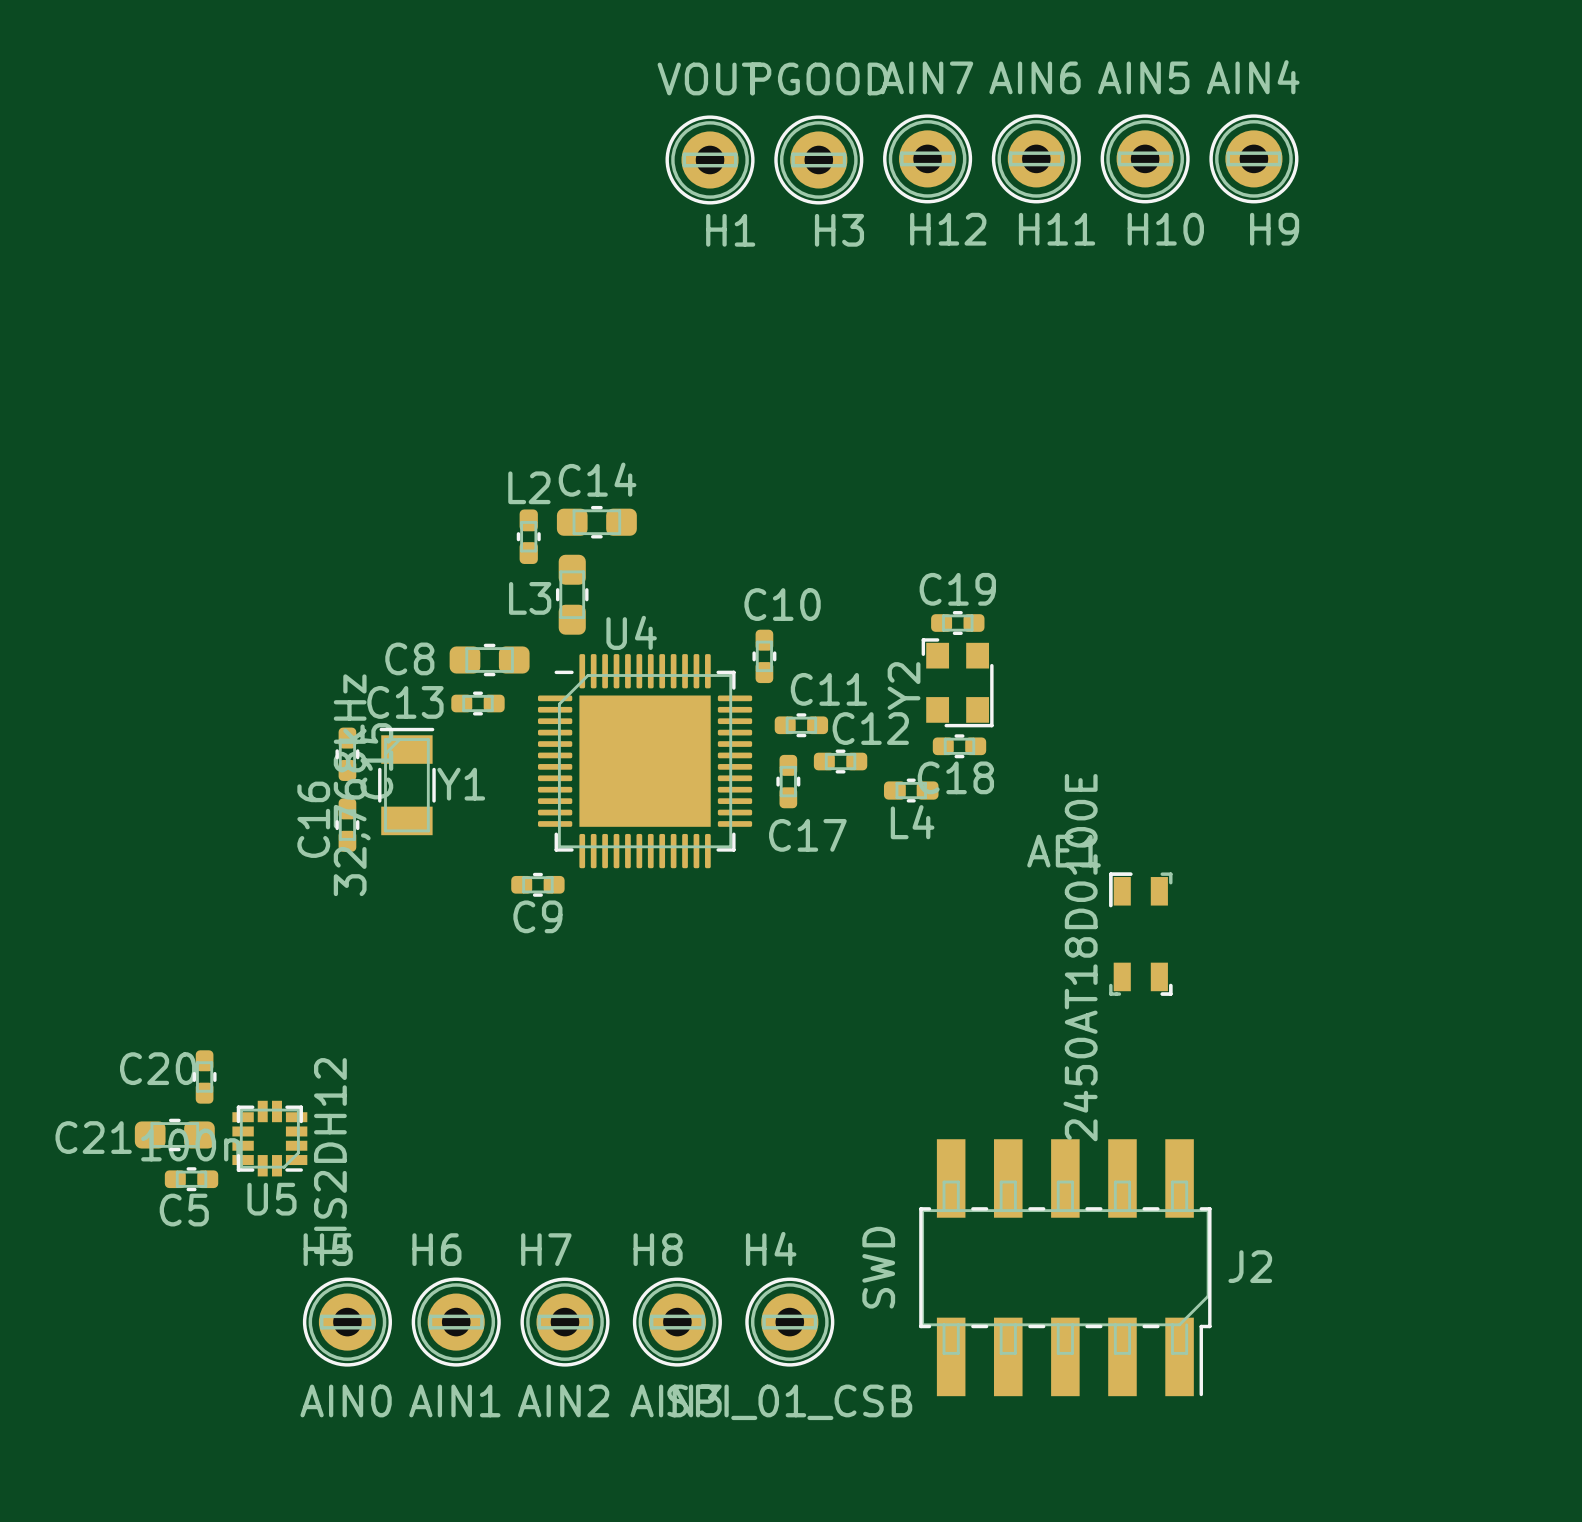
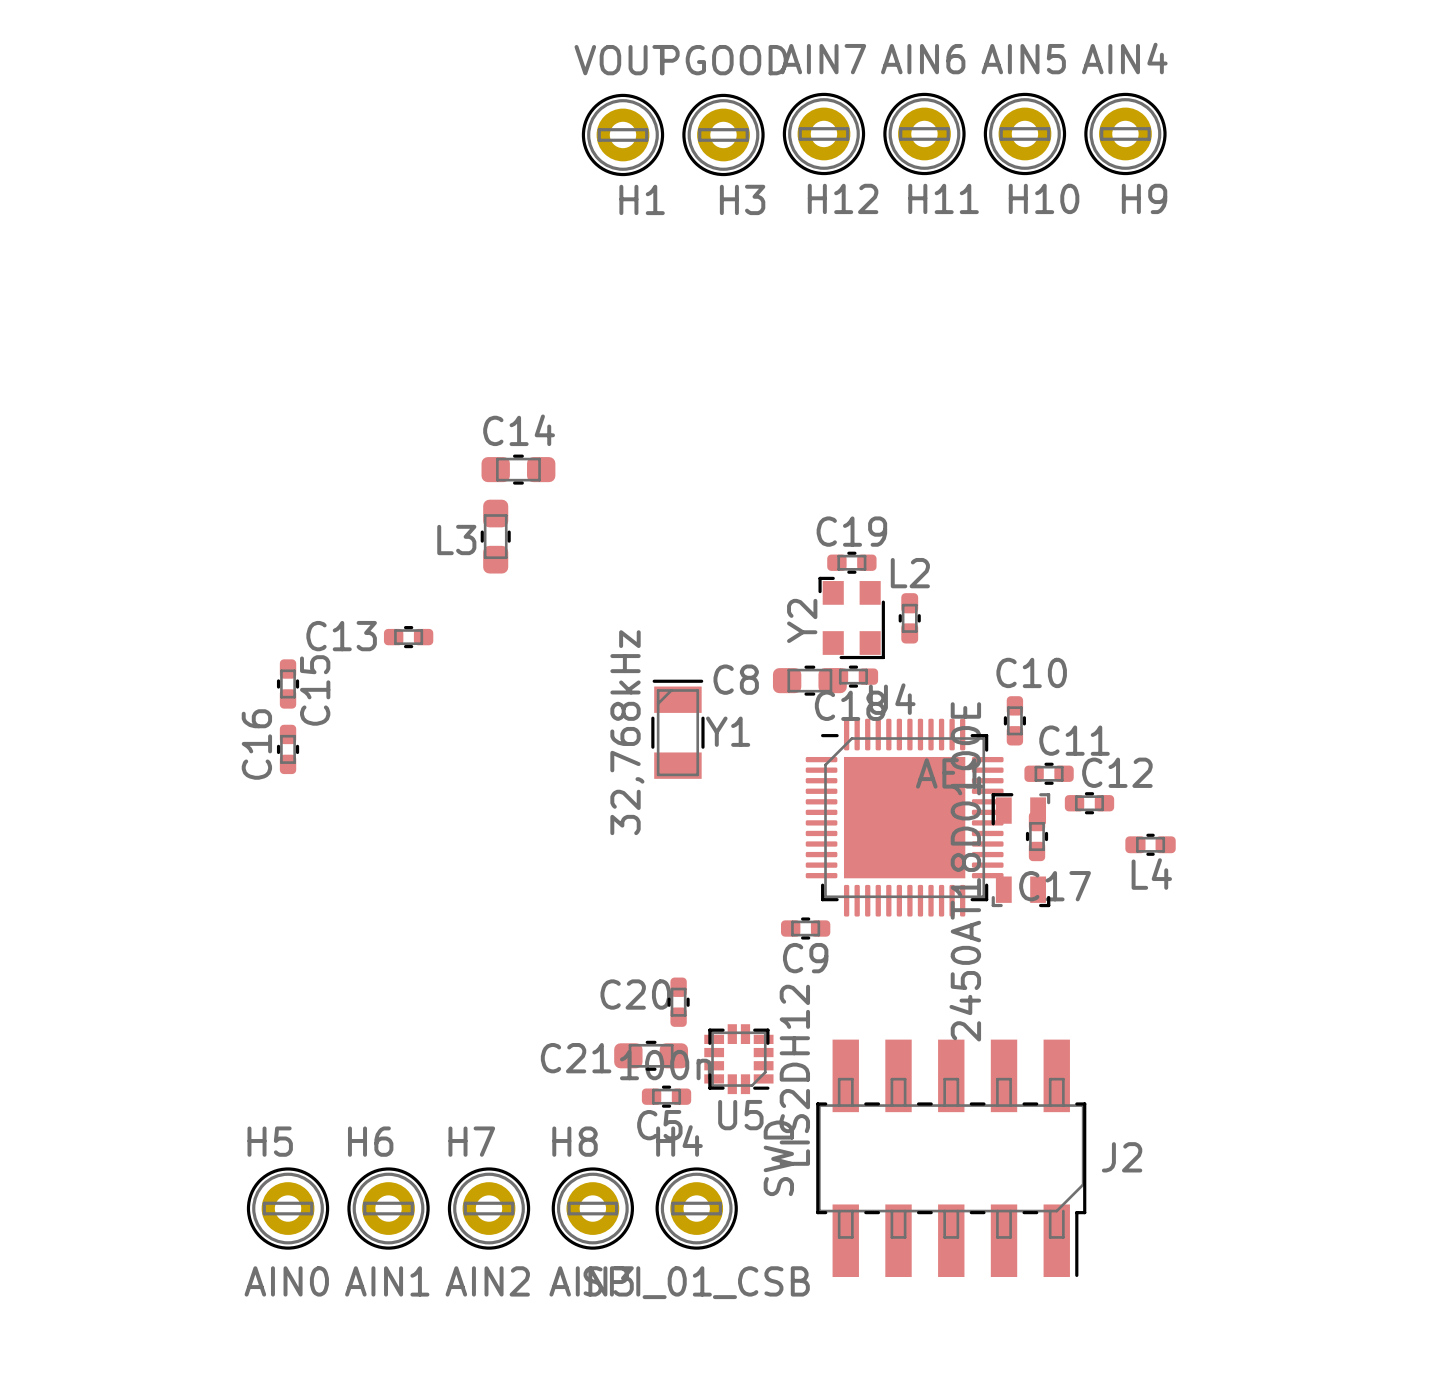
L2 position: (528, 536) -> (909, 618)
C10 position: (764, 656) -> (1014, 720)
C8 position: (489, 659) -> (809, 680)
C11 position: (801, 725) -> (1049, 773)
U4 position: (645, 761) -> (904, 817)
C12 position: (840, 761) -> (1089, 803)
Y1 position: (406, 781) -> (677, 729)
C17 position: (788, 781) -> (1037, 836)
L4 position: (911, 790) -> (1150, 844)
C9 position: (537, 884) -> (805, 928)
C20 position: (204, 1076) -> (678, 1002)
C21 position: (174, 1134) -> (651, 1055)
U5 position: (269, 1138) -> (738, 1059)
C5 position: (191, 1179) -> (666, 1096)

